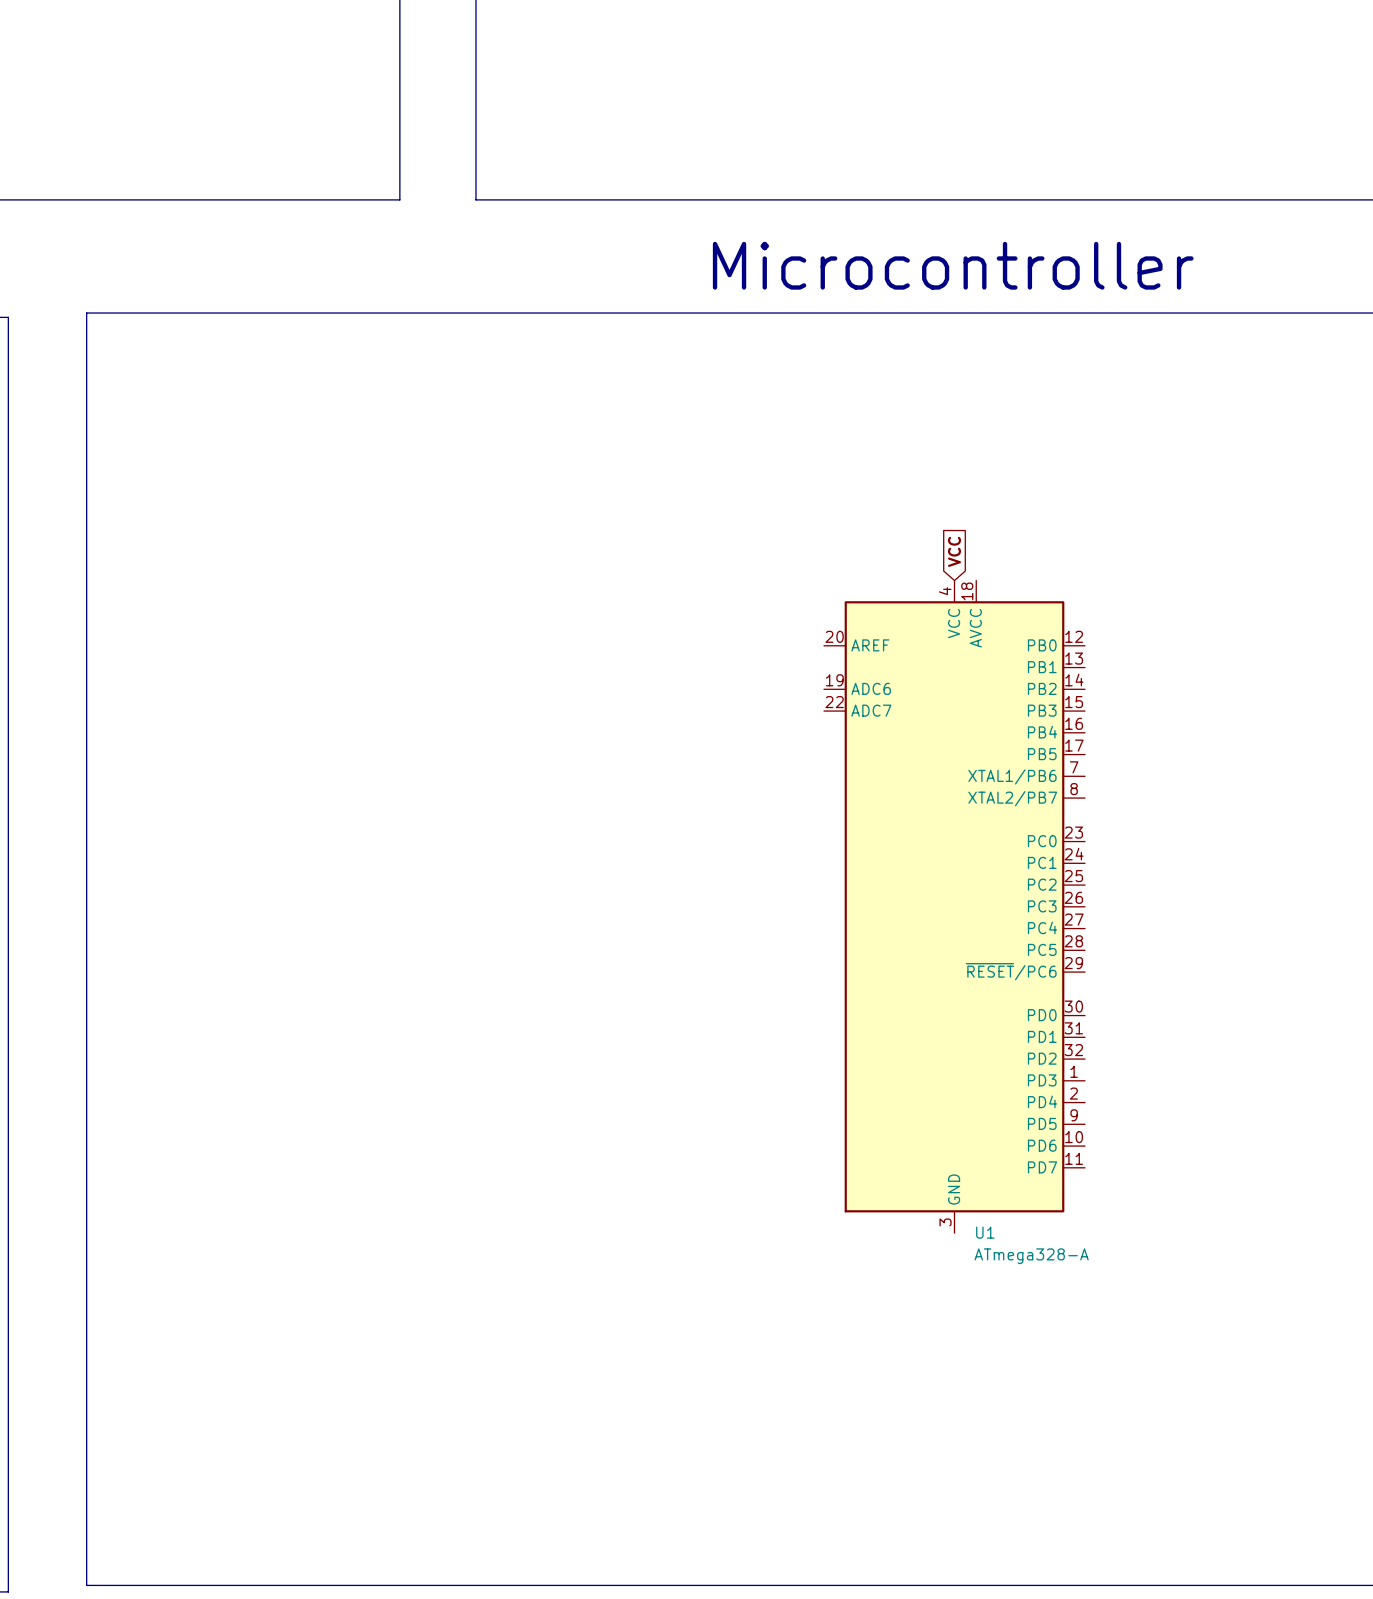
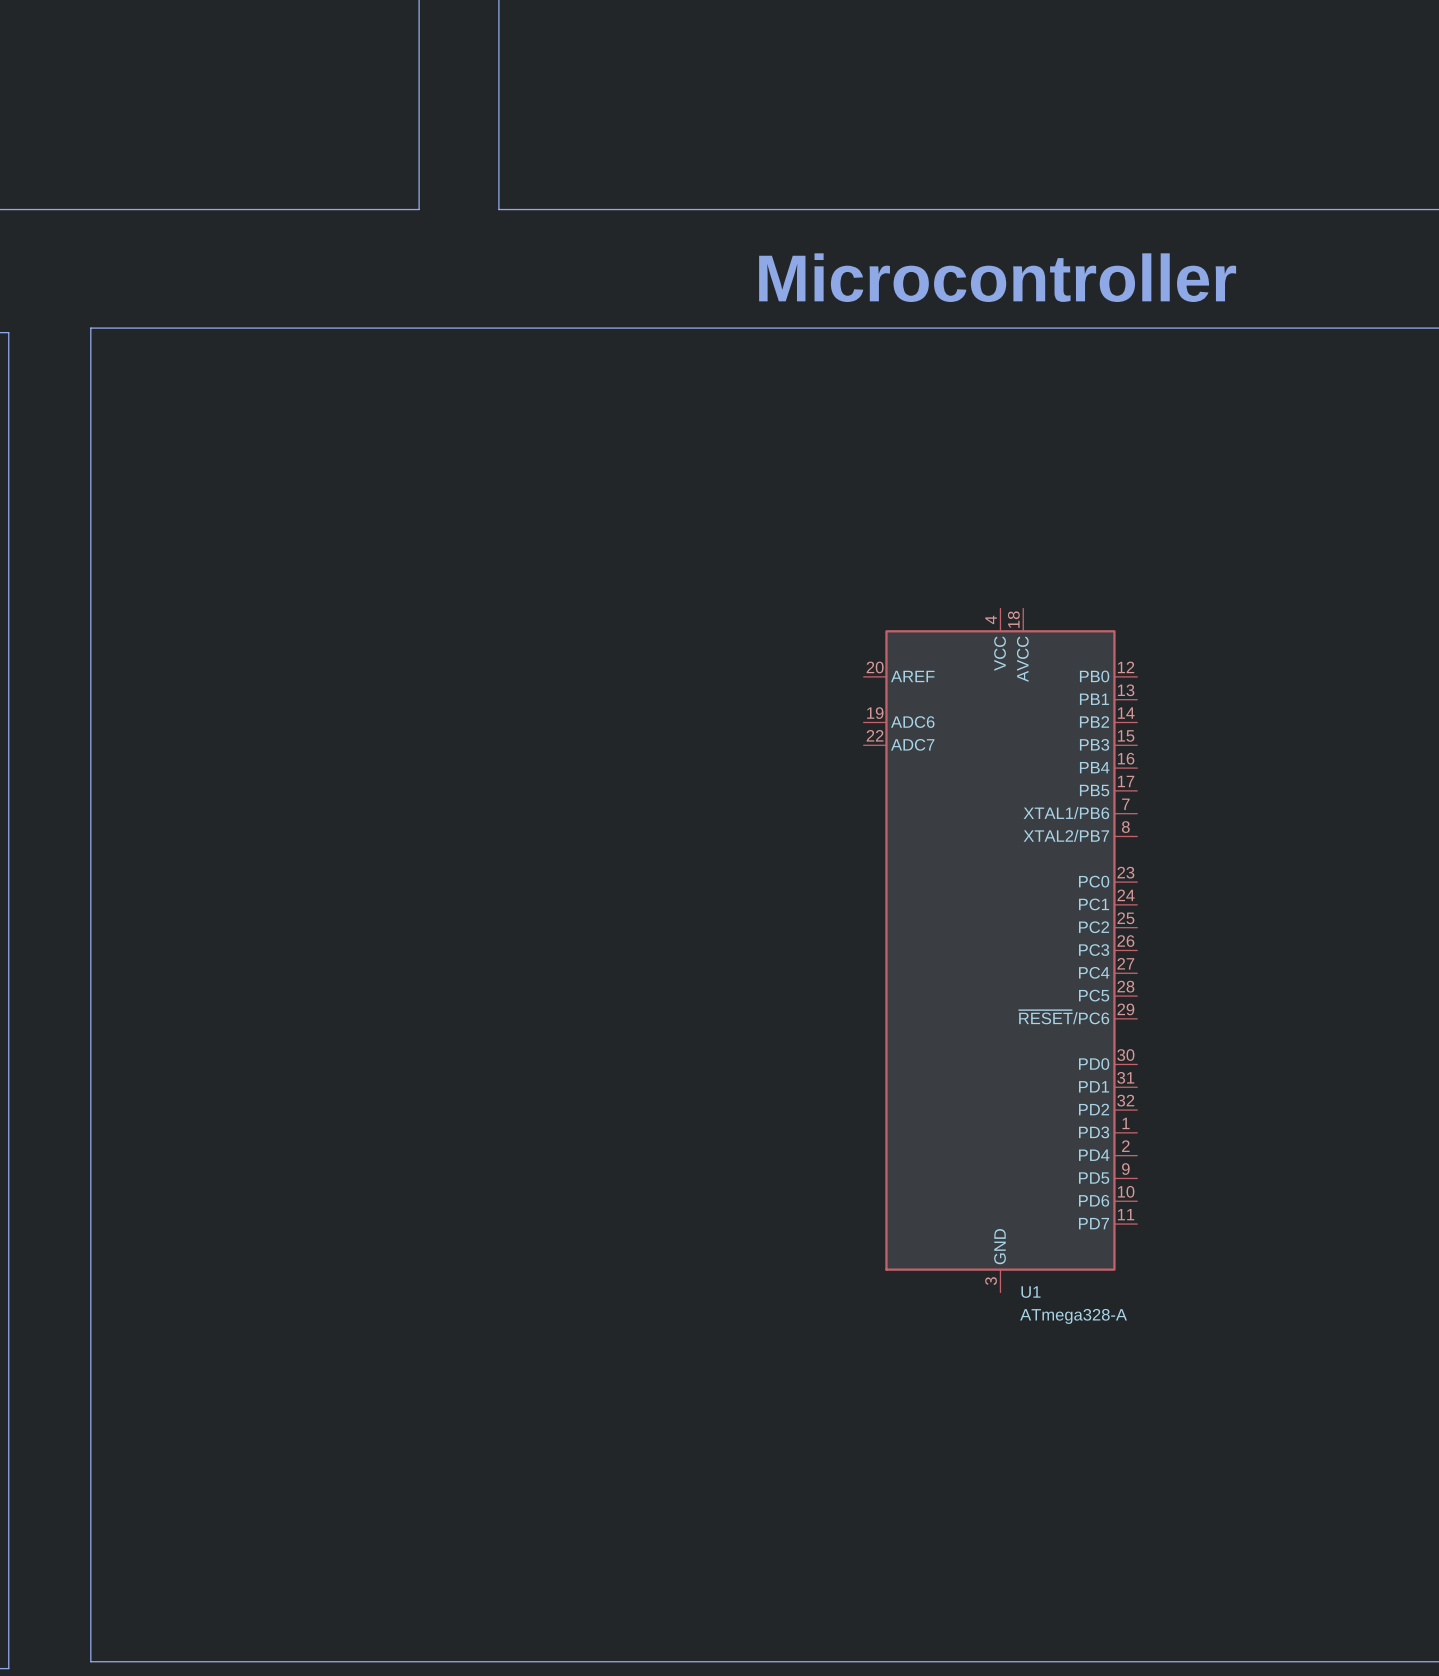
global label: VCC (954, 551) -> none

